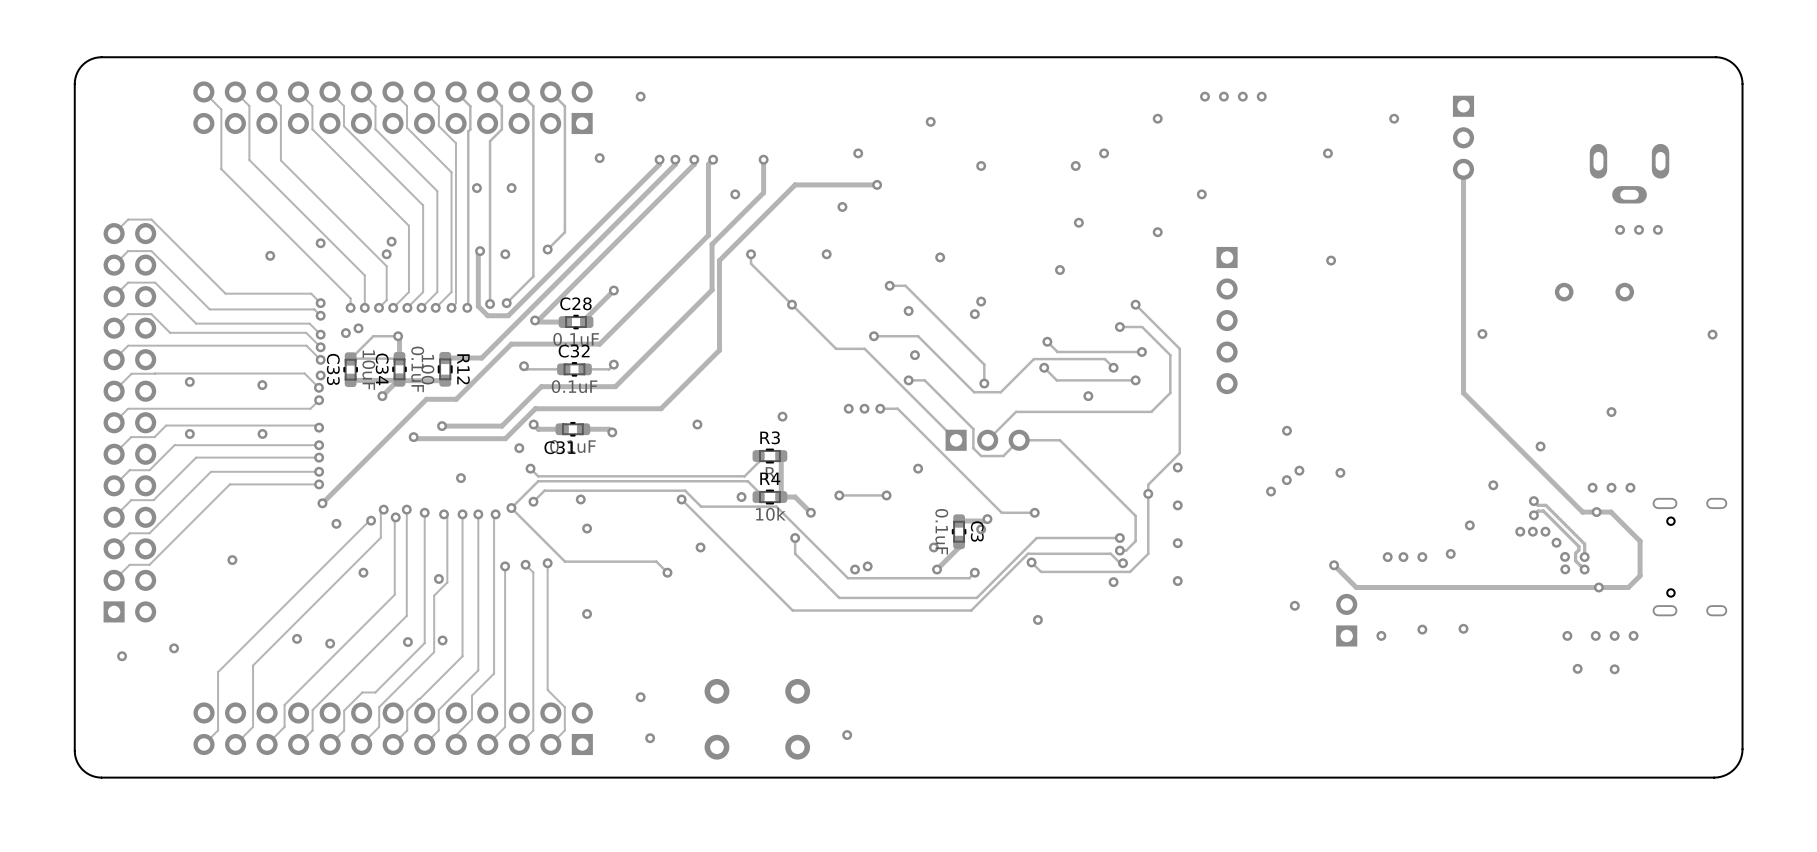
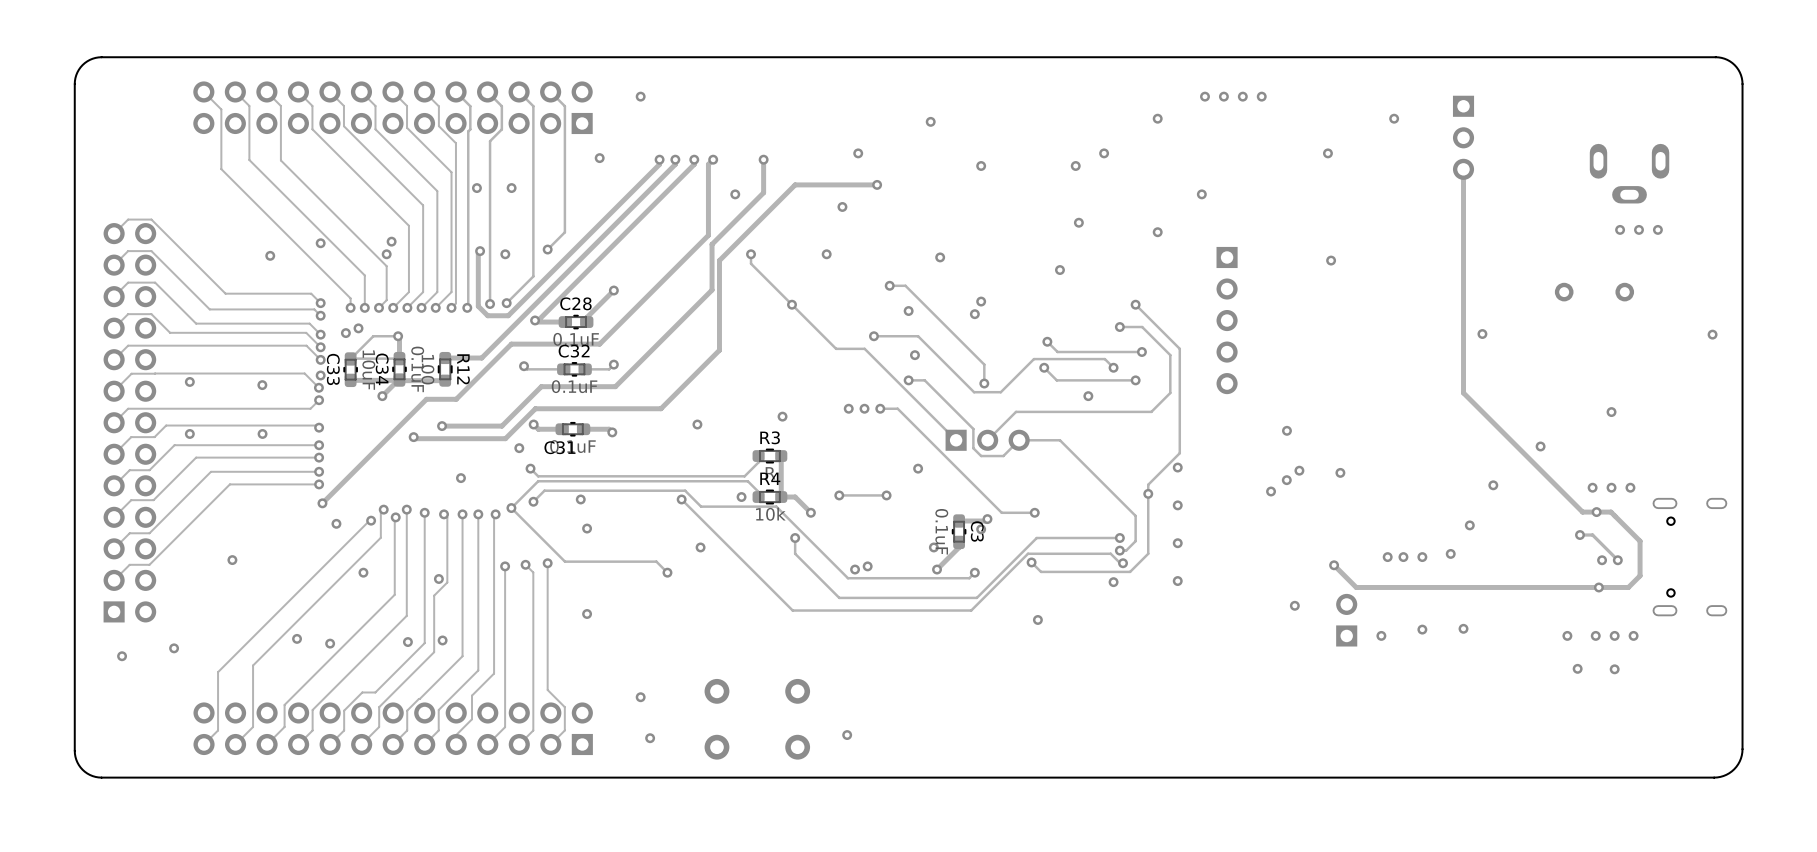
track: (1533, 501) (1538, 505) (1545, 505) (1584, 544) (1584, 557) -> none
via: (1533, 501) -> none
track: (1533, 515) (1538, 511) (1543, 511) (1578, 546) (1578, 550) (1575, 553) (1575, 560) (1584, 569) -> none
via: (1533, 515) -> none
via: (1520, 531) -> none
via: (1532, 531) -> none
via: (1545, 531) -> none
track: none -> (1580, 535) (1592, 535) (1617, 560)
via: none -> (1580, 535)
via: (1556, 542) -> none
via: (1565, 556) -> none
via: (1584, 557) -> none
via: none -> (1602, 560)
via: none -> (1617, 560)
via: (1565, 569) -> none
via: (1584, 569) -> none

